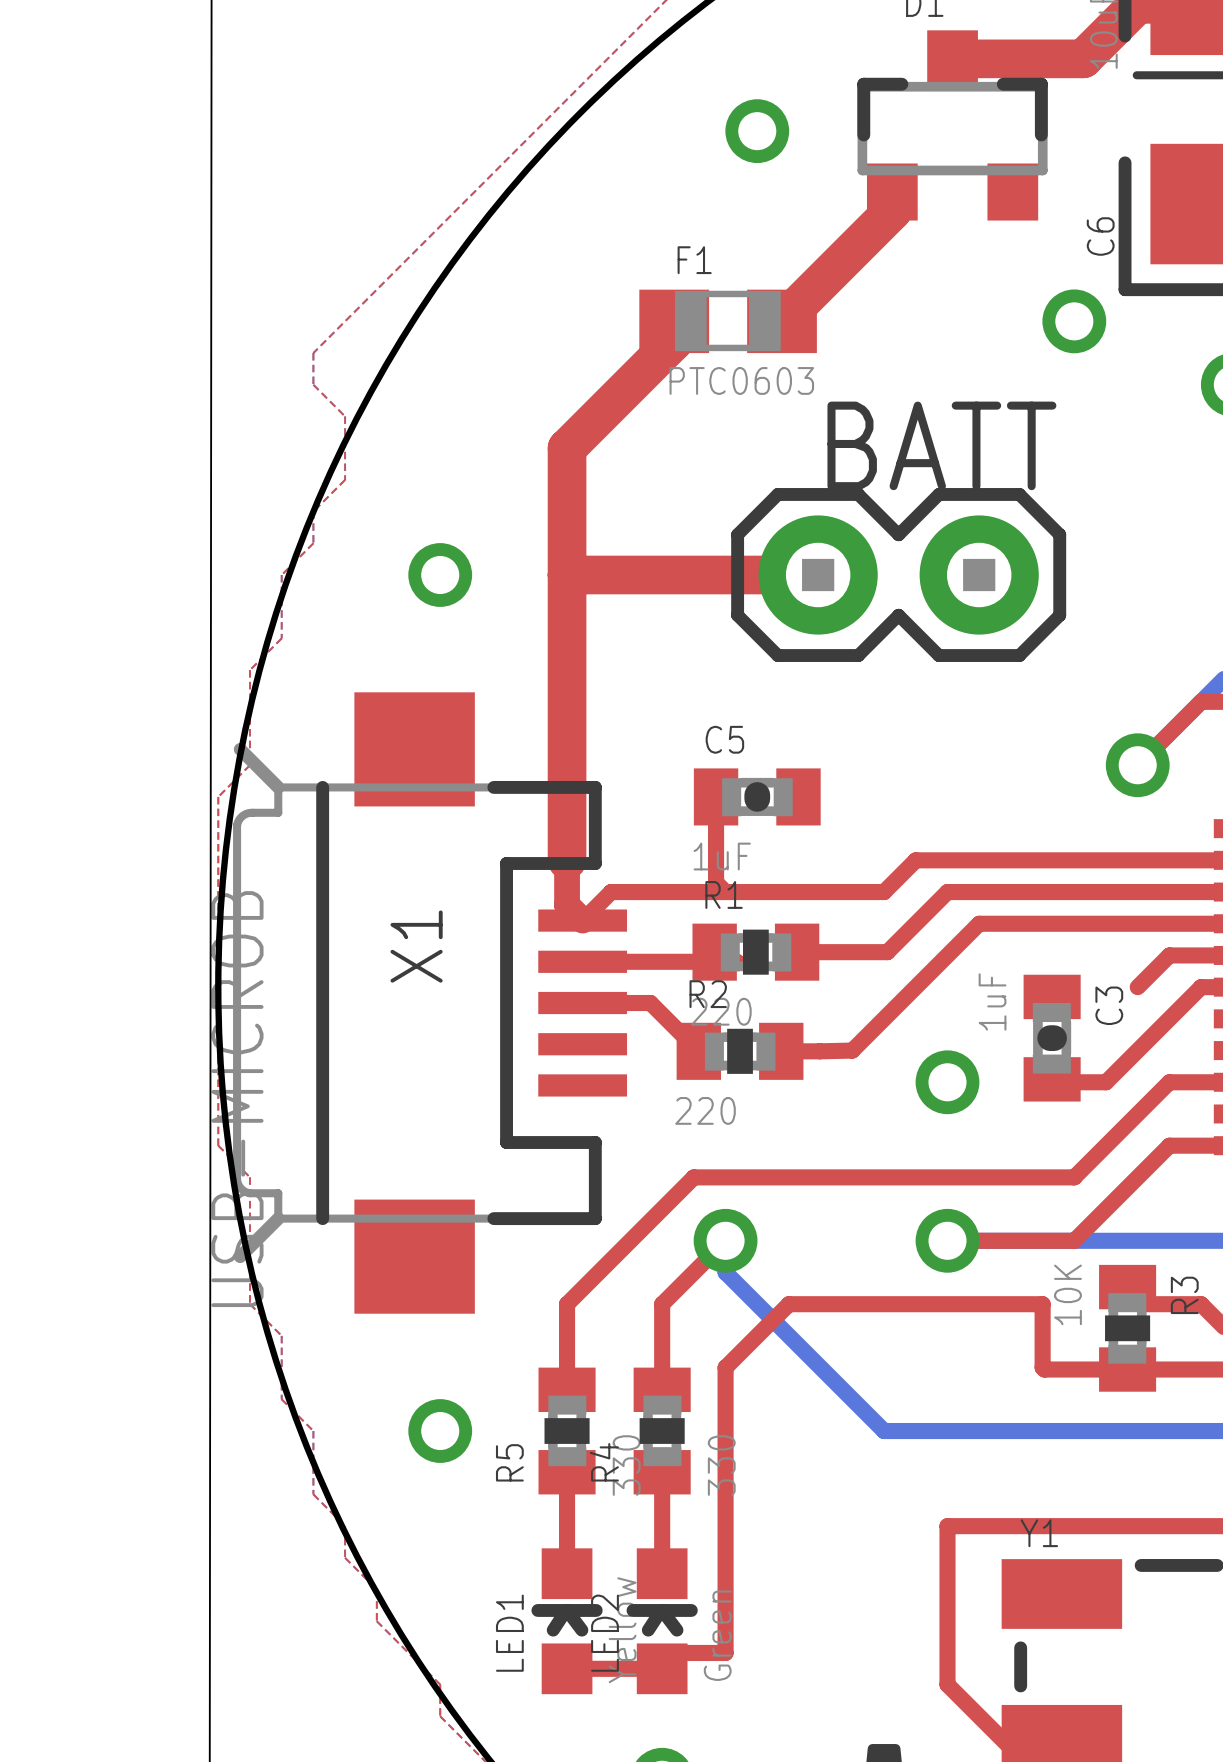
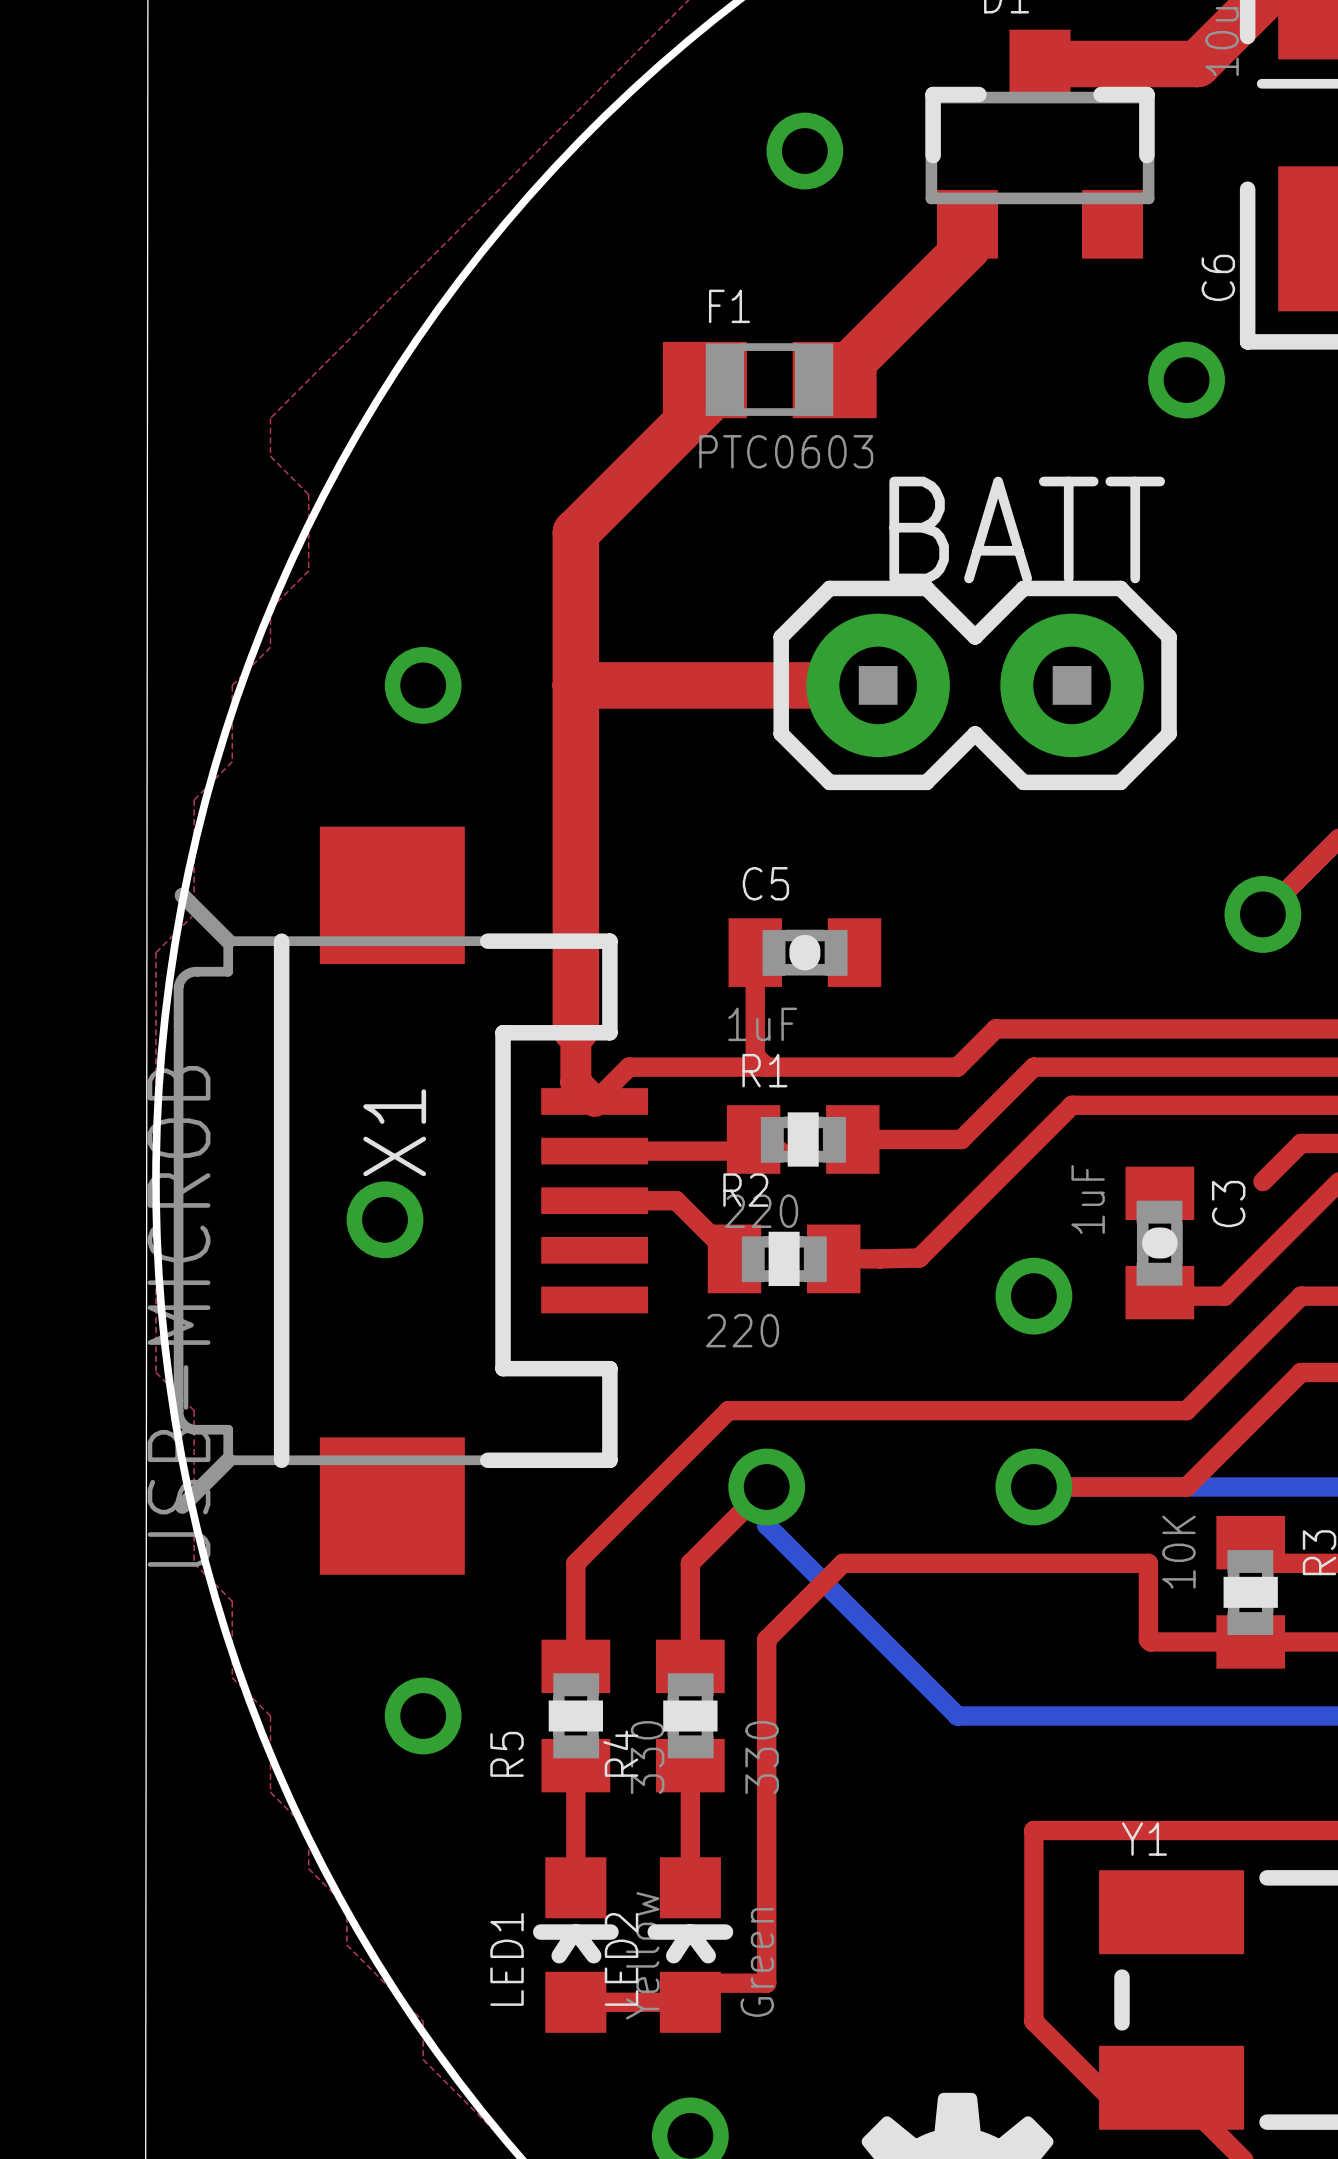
via: none -> (385, 1219)

